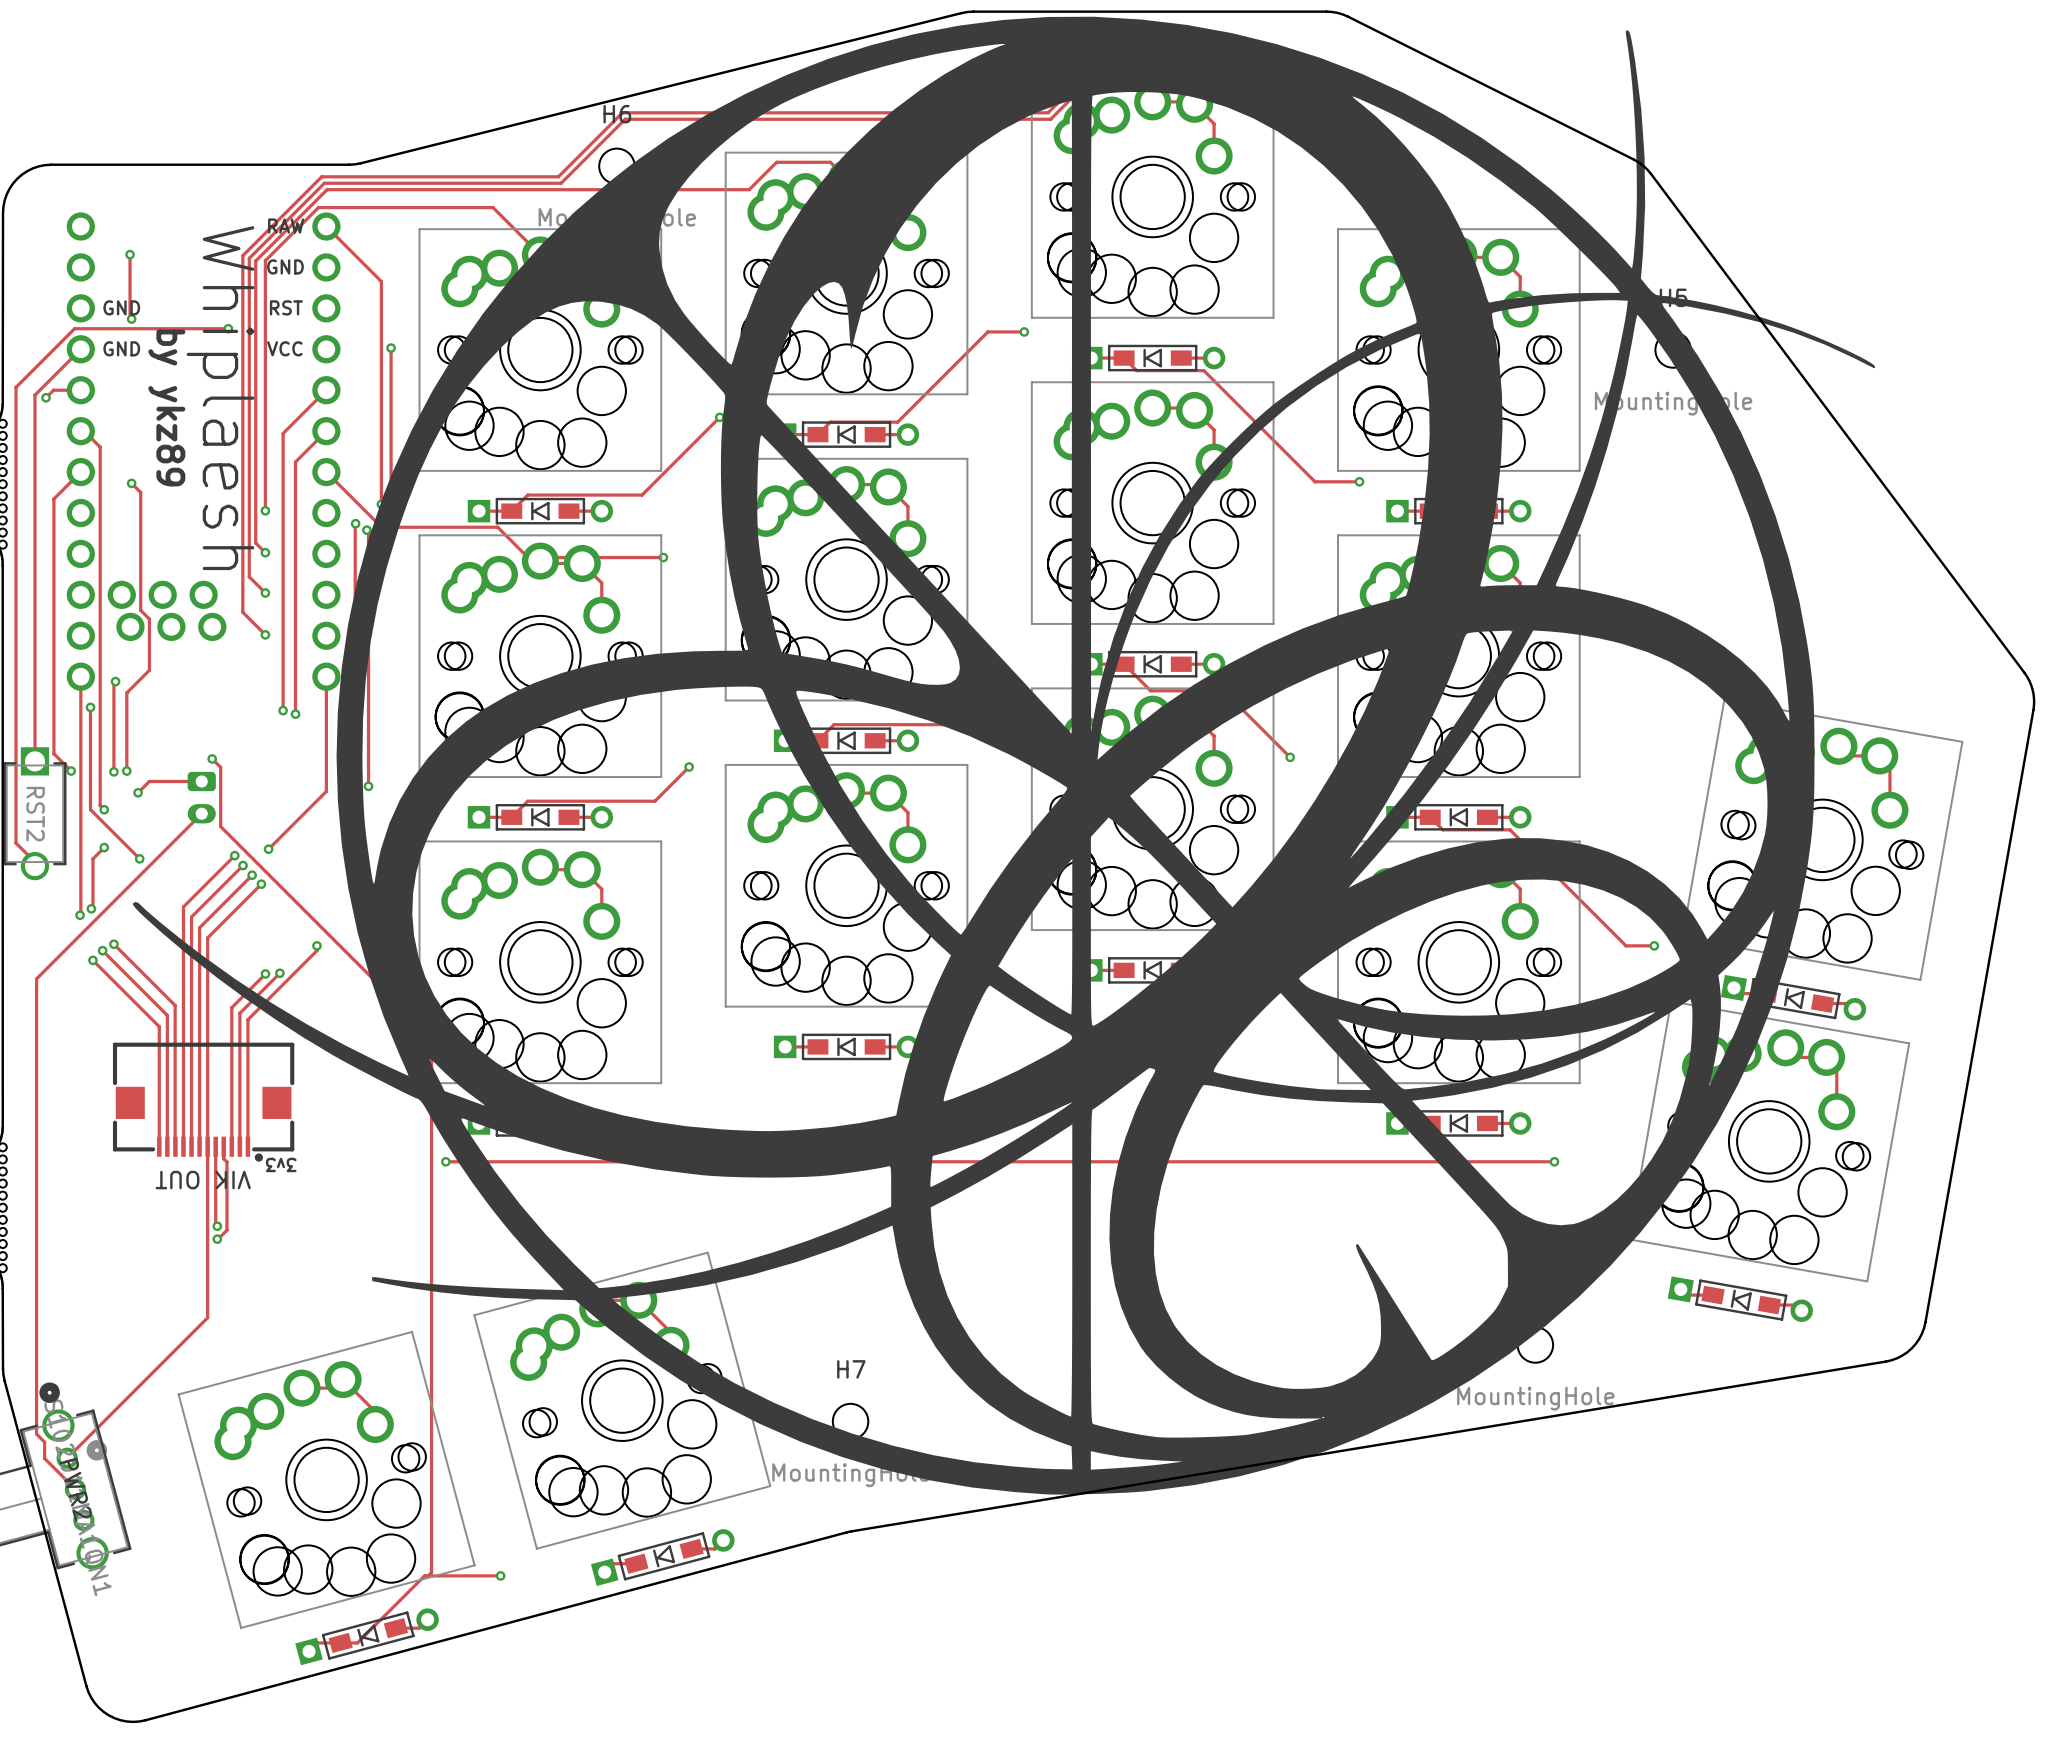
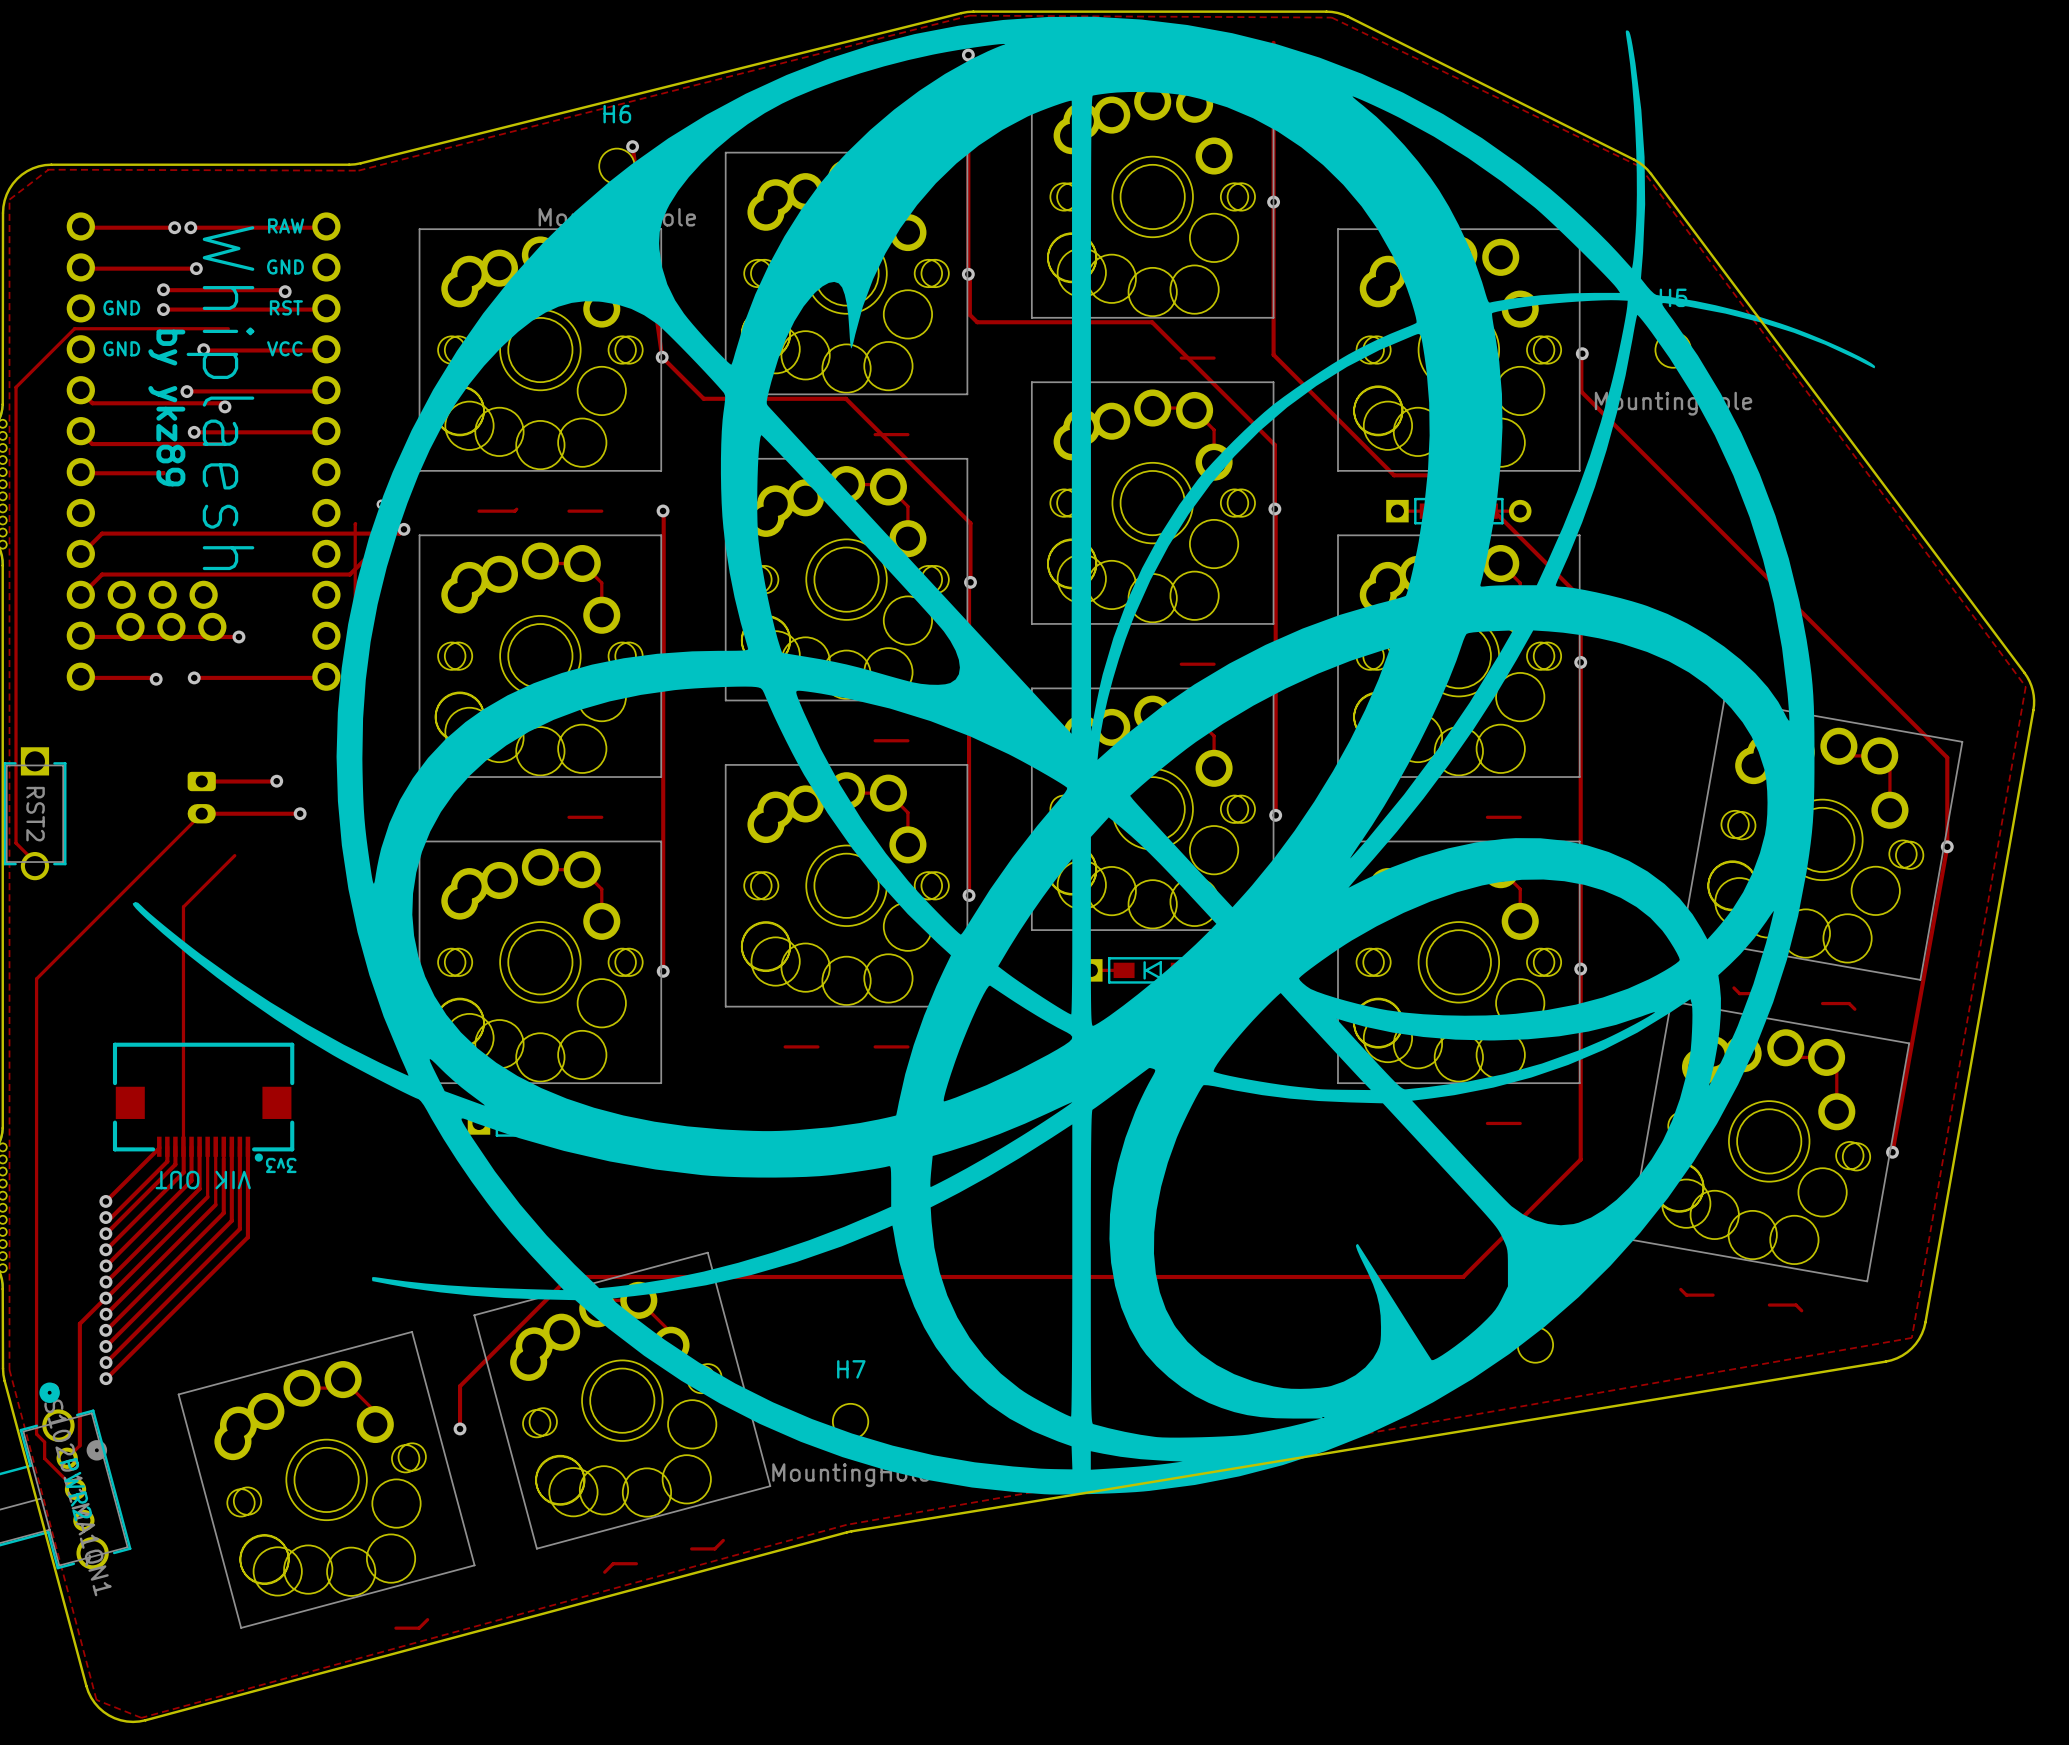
zone outline: none -> (969, 15) (358, 170) (47, 169) (9, 199) (9, 1369) (96, 1699) (141, 1717) (846, 1524) (1911, 1337) (2025, 686) (1639, 166) (1331, 17) (969, 15)
track: none -> (1273, 42) (1273, 354) (1394, 475) (1458, 475) (1580, 597) (1580, 1159) (1463, 1277) (569, 1277) (460, 1386) (460, 1428)
track: none -> (968, 55) (969, 314) (977, 322) (1152, 322) (1274, 445) (1275, 815)
via: none -> (968, 55)
track: none -> (632, 146) (662, 357) (703, 398) (845, 398) (970, 523) (969, 895)
via: none -> (632, 146)
track: (1214, 156) (1214, 123) (1192, 101) (1152, 101) (1136, 85) (1084, 85) (1050, 119) (625, 119) (561, 183) (324, 183) (249, 258) (249, 576) (265, 592) -> none
via: none -> (1273, 202)
track: (326, 226) (381, 281) (381, 504) -> none
track: none -> (80, 227) (174, 227)
via: none -> (174, 227)
track: none -> (190, 227) (326, 227)
via: none -> (190, 227)
track: (907, 232) (907, 200) (886, 178) (846, 178) (830, 162) (776, 162) (749, 189) (327, 189) (255, 261) (255, 543) (265, 552) -> none
track: (130, 254) (130, 317) (131, 319) -> none
via: (130, 254) -> none
track: none -> (80, 268) (196, 268)
via: none -> (196, 268)
via: none -> (968, 274)
track: none -> (163, 289) (285, 291)
via: none -> (163, 289)
via: none -> (285, 291)
track: none -> (163, 309) (326, 309)
via: none -> (163, 309)
track: (601, 309) (603, 306) (603, 278) (579, 254) (540, 254) (492, 207) (318, 207) (265, 260) (265, 510) -> none
track: (1520, 309) (1520, 276) (1500, 257) (1460, 257) (1282, 78) (1082, 78) (1048, 112) (622, 112) (558, 176) (321, 176) (242, 255) (242, 612) (265, 634) -> none
via: (131, 319) -> none
via: (228, 328) -> none
track: (1024, 331) (987, 331) (897, 422) (830, 422) (817, 434) (785, 434) -> none
via: (1024, 331) -> none
track: (391, 348) (391, 501) (397, 507) -> none
via: (391, 348) -> none
track: (80, 349) (34, 395) (34, 761) -> none
track: none -> (203, 349) (326, 350)
via: none -> (203, 349)
track: none -> (1582, 353) (1581, 391) (1947, 757) (1947, 846) (1892, 1152)
via: none -> (1582, 353)
via: none -> (662, 357)
track: (1091, 358) (1124, 358) (1136, 370) (1203, 370) (1315, 481) (1359, 481) -> none
part: (1152, 358) -> none
track: (80, 390) (53, 390) (46, 397) -> none
track: (326, 390) (283, 433) (283, 710) -> none
track: none -> (80, 391) (92, 403) (221, 403) (224, 406)
via: none -> (186, 391)
track: none -> (187, 391) (326, 391)
via: (46, 397) -> none
via: none -> (224, 406)
track: (719, 417) (642, 495) (527, 495) (511, 511) -> none
via: (719, 417) -> none
track: (80, 431) (84, 431) (100, 447) (100, 805) (104, 809) -> none
track: (326, 431) (295, 462) (295, 714) -> none
track: none -> (80, 432) (92, 444) (224, 444)
track: none -> (194, 432) (326, 432)
via: none -> (194, 432)
part: (846, 434) -> none
track: (80, 472) (53, 498) (53, 753) (71, 771) -> none
track: none -> (163, 472) (80, 473)
track: (326, 472) (381, 527) (497, 527) (528, 557) (663, 557) -> none
via: (1359, 481) -> none
track: (131, 483) (140, 492) (140, 610) (149, 619) (149, 670) (126, 692) (126, 771) -> none
via: (131, 483) -> none
via: none -> (1274, 509)
via: (265, 510) -> none
track: none -> (663, 510) (663, 971)
via: none -> (663, 510)
part: (540, 511) -> none
via: (355, 523) -> none
track: none -> (403, 529) (399, 533) (102, 533) (80, 555)
via: none -> (403, 529)
track: (366, 530) (368, 531) (368, 786) -> none
via: (366, 530) -> none
track: none -> (379, 545) (349, 574) (102, 574) (80, 596)
via: (265, 552) -> none
via: (663, 557) -> none
via: none -> (970, 582)
via: (265, 592) -> none
via: (265, 634) -> none
track: none -> (80, 636) (238, 636)
via: none -> (238, 636)
via: none -> (1580, 662)
track: (1091, 664) (1124, 664) (1150, 690) (1223, 690) (1290, 757) -> none
part: (1152, 664) -> none
track: (80, 676) (80, 915) -> none
track: (326, 676) (326, 791) (268, 849) -> none
track: none -> (80, 677) (156, 679)
track: none -> (194, 677) (326, 677)
via: none -> (194, 677)
via: none -> (156, 679)
track: (115, 681) (113, 683) (113, 771) -> none
via: (115, 681) -> none
track: (985, 694) (955, 724) (834, 724) (817, 740) (785, 740) -> none
track: (90, 707) (90, 809) (139, 858) -> none
via: (90, 707) -> none
via: (283, 710) -> none
via: (295, 714) -> none
part: (846, 740) -> none
via: (1290, 757) -> none
track: (212, 758) (220, 767) (220, 826) (431, 1037) (431, 1572) (428, 1575) -> none
via: (212, 758) -> none
track: (689, 767) (654, 801) (527, 801) (511, 817) (478, 817) -> none
via: (689, 767) -> none
via: (71, 771) -> none
via: (113, 771) -> none
via: (126, 771) -> none
track: (201, 781) (149, 781) (138, 792) -> (201, 781) (276, 781)
via: none -> (276, 781)
via: (368, 786) -> none
via: (138, 792) -> none
via: (104, 809) -> none
track: none -> (201, 813) (300, 813)
via: none -> (300, 813)
via: none -> (1275, 815)
part: (540, 817) -> none
track: (1397, 817) (1430, 817) (1442, 829) (1510, 829) (1626, 945) (1654, 945) -> none
part: (1458, 817) -> none
via: none -> (1947, 846)
track: (104, 847) (92, 858) (92, 907) (91, 908) -> none
via: (104, 847) -> none
via: (268, 849) -> none
via: (234, 855) -> none
via: (139, 858) -> none
track: (243, 865) (191, 917) (191, 1146) -> (106, 1265) (191, 1180) (191, 1146)
via: (243, 865) -> none
track: (252, 875) (199, 927) (199, 1146) -> (106, 1281) (199, 1188) (199, 1146)
via: (252, 875) -> none
track: (261, 884) (207, 937) (207, 1146) -> none
via: (261, 884) -> none
via: none -> (969, 895)
via: (91, 908) -> none
via: (80, 915) -> none
track: (113, 944) (175, 1005) (175, 1146) -> (105, 1233) (175, 1164) (175, 1146)
via: (113, 944) -> none
track: (316, 945) (316, 950) (247, 1019) (247, 1146) -> (106, 1378) (247, 1237) (247, 1146)
via: (316, 945) -> none
via: (1654, 945) -> none
track: (102, 950) (167, 1015) (167, 1146) -> (105, 1217) (111, 1217) (167, 1161) (167, 1146)
via: (102, 950) -> none
track: (92, 960) (159, 1026) (159, 1146) -> (106, 1201) (159, 1146)
via: (92, 960) -> none
via: none -> (1580, 969)
via: none -> (663, 971)
track: (265, 973) (231, 1007) (231, 1146) -> (105, 1346) (231, 1220) (231, 1146)
via: (265, 973) -> none
track: (279, 973) (239, 1013) (239, 1146) -> (106, 1362) (239, 1229) (239, 1146)
via: (279, 973) -> none
part: (1793, 997) -> none
part footprint: [112, 1042, 295, 1162] -> [112, 1042, 295, 1162]
part: (846, 1046) -> none
part: (1458, 1123) -> none
track: none -> (183, 1147) (183, 1172) (105, 1249)
via: none -> (1892, 1152)
track: (223, 1158) (226, 1162) (226, 1230) (217, 1239) -> (223, 1158) (223, 1213) (105, 1330)
track: (445, 1161) (1554, 1161) -> none
via: (445, 1161) -> none
via: (1554, 1161) -> none
track: (207, 1196) (207, 1317) (79, 1445) -> (207, 1196) (79, 1323) (79, 1445)
via: none -> (105, 1201)
track: (215, 1204) (217, 1226) -> (215, 1204) (106, 1314)
via: none -> (105, 1217)
via: (217, 1226) -> none
via: none -> (105, 1233)
via: (217, 1239) -> none
via: none -> (105, 1249)
via: none -> (106, 1265)
via: none -> (106, 1281)
via: none -> (105, 1298)
part: (1740, 1299) -> none
via: none -> (106, 1314)
via: none -> (105, 1330)
via: none -> (105, 1346)
via: none -> (106, 1362)
via: none -> (106, 1378)
part value: MountingHole (1535, 1398) -> none
via: none -> (460, 1428)
part: (662, 1557) -> none
track: (500, 1575) (424, 1575) (357, 1642) (317, 1642) (309, 1651) -> none
via: (500, 1575) -> none
part: (367, 1636) -> none

